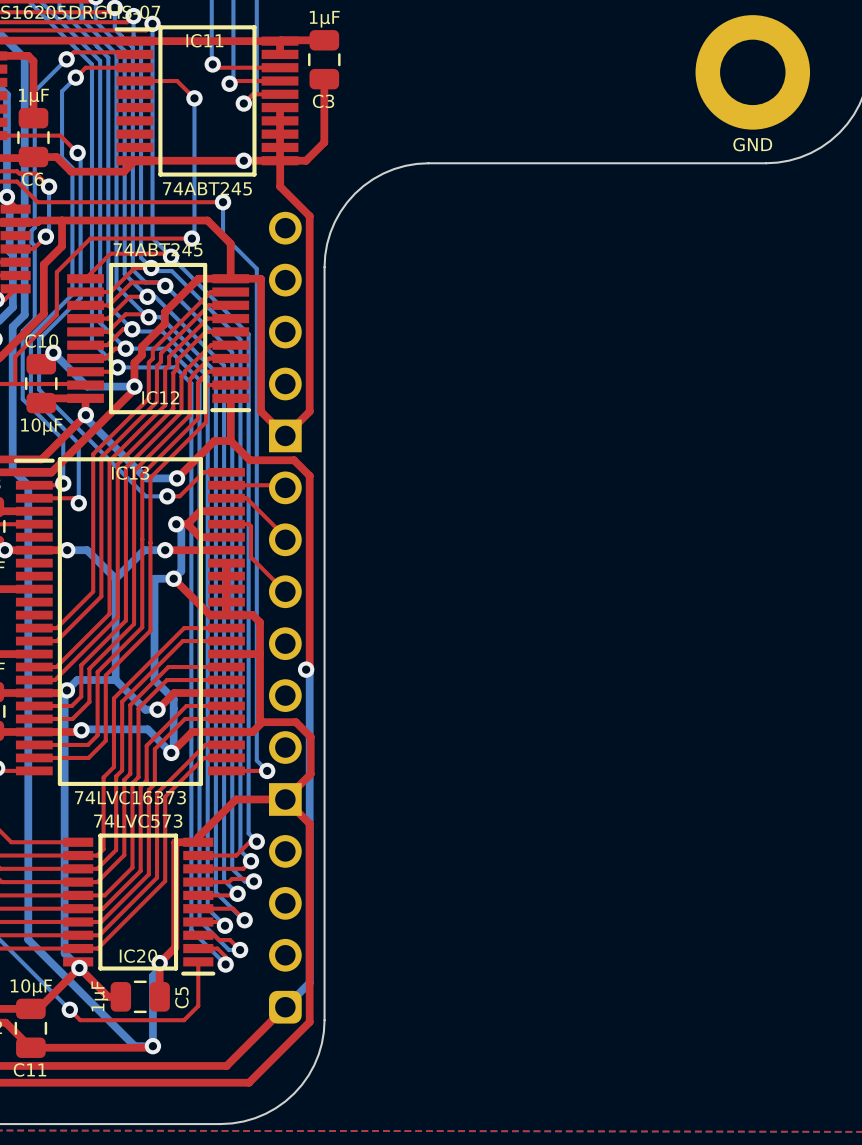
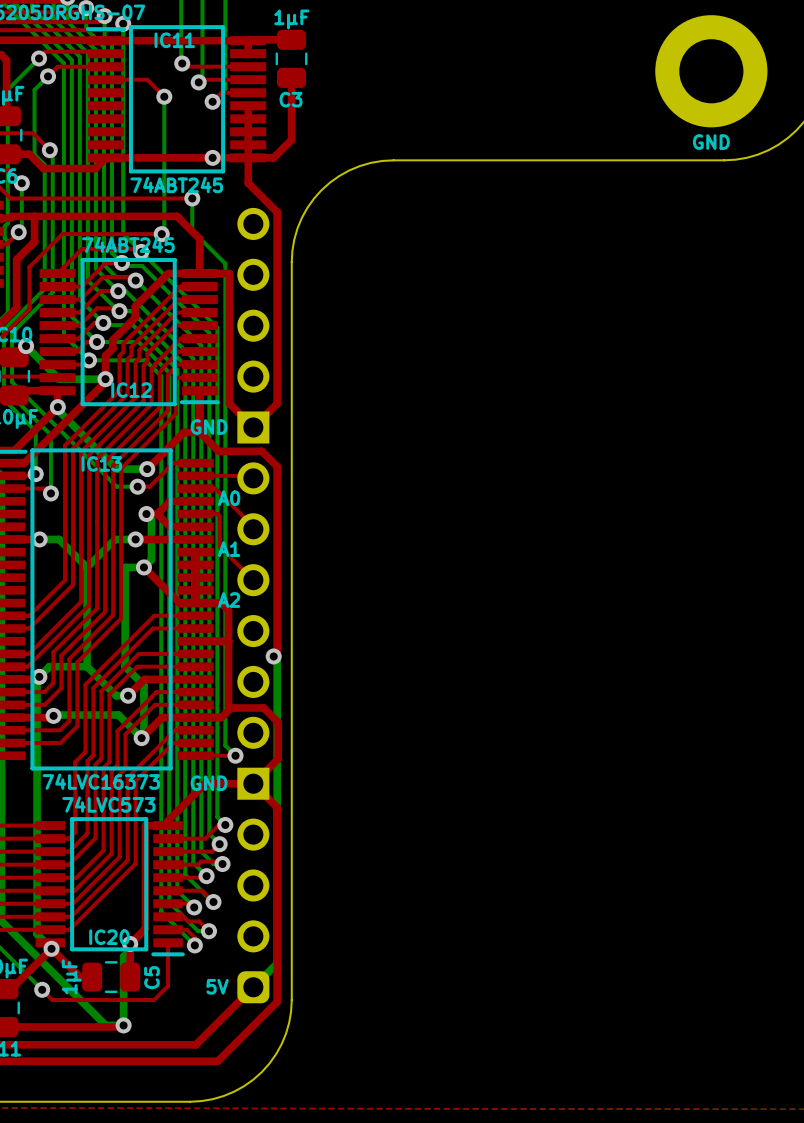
text: none -> GND (209, 427)
text: none -> A0 (229, 498)
text: none -> A1 (229, 549)
text: none -> A2 (229, 600)
text: none -> GND (209, 783)
text: none -> 5V (217, 986)

